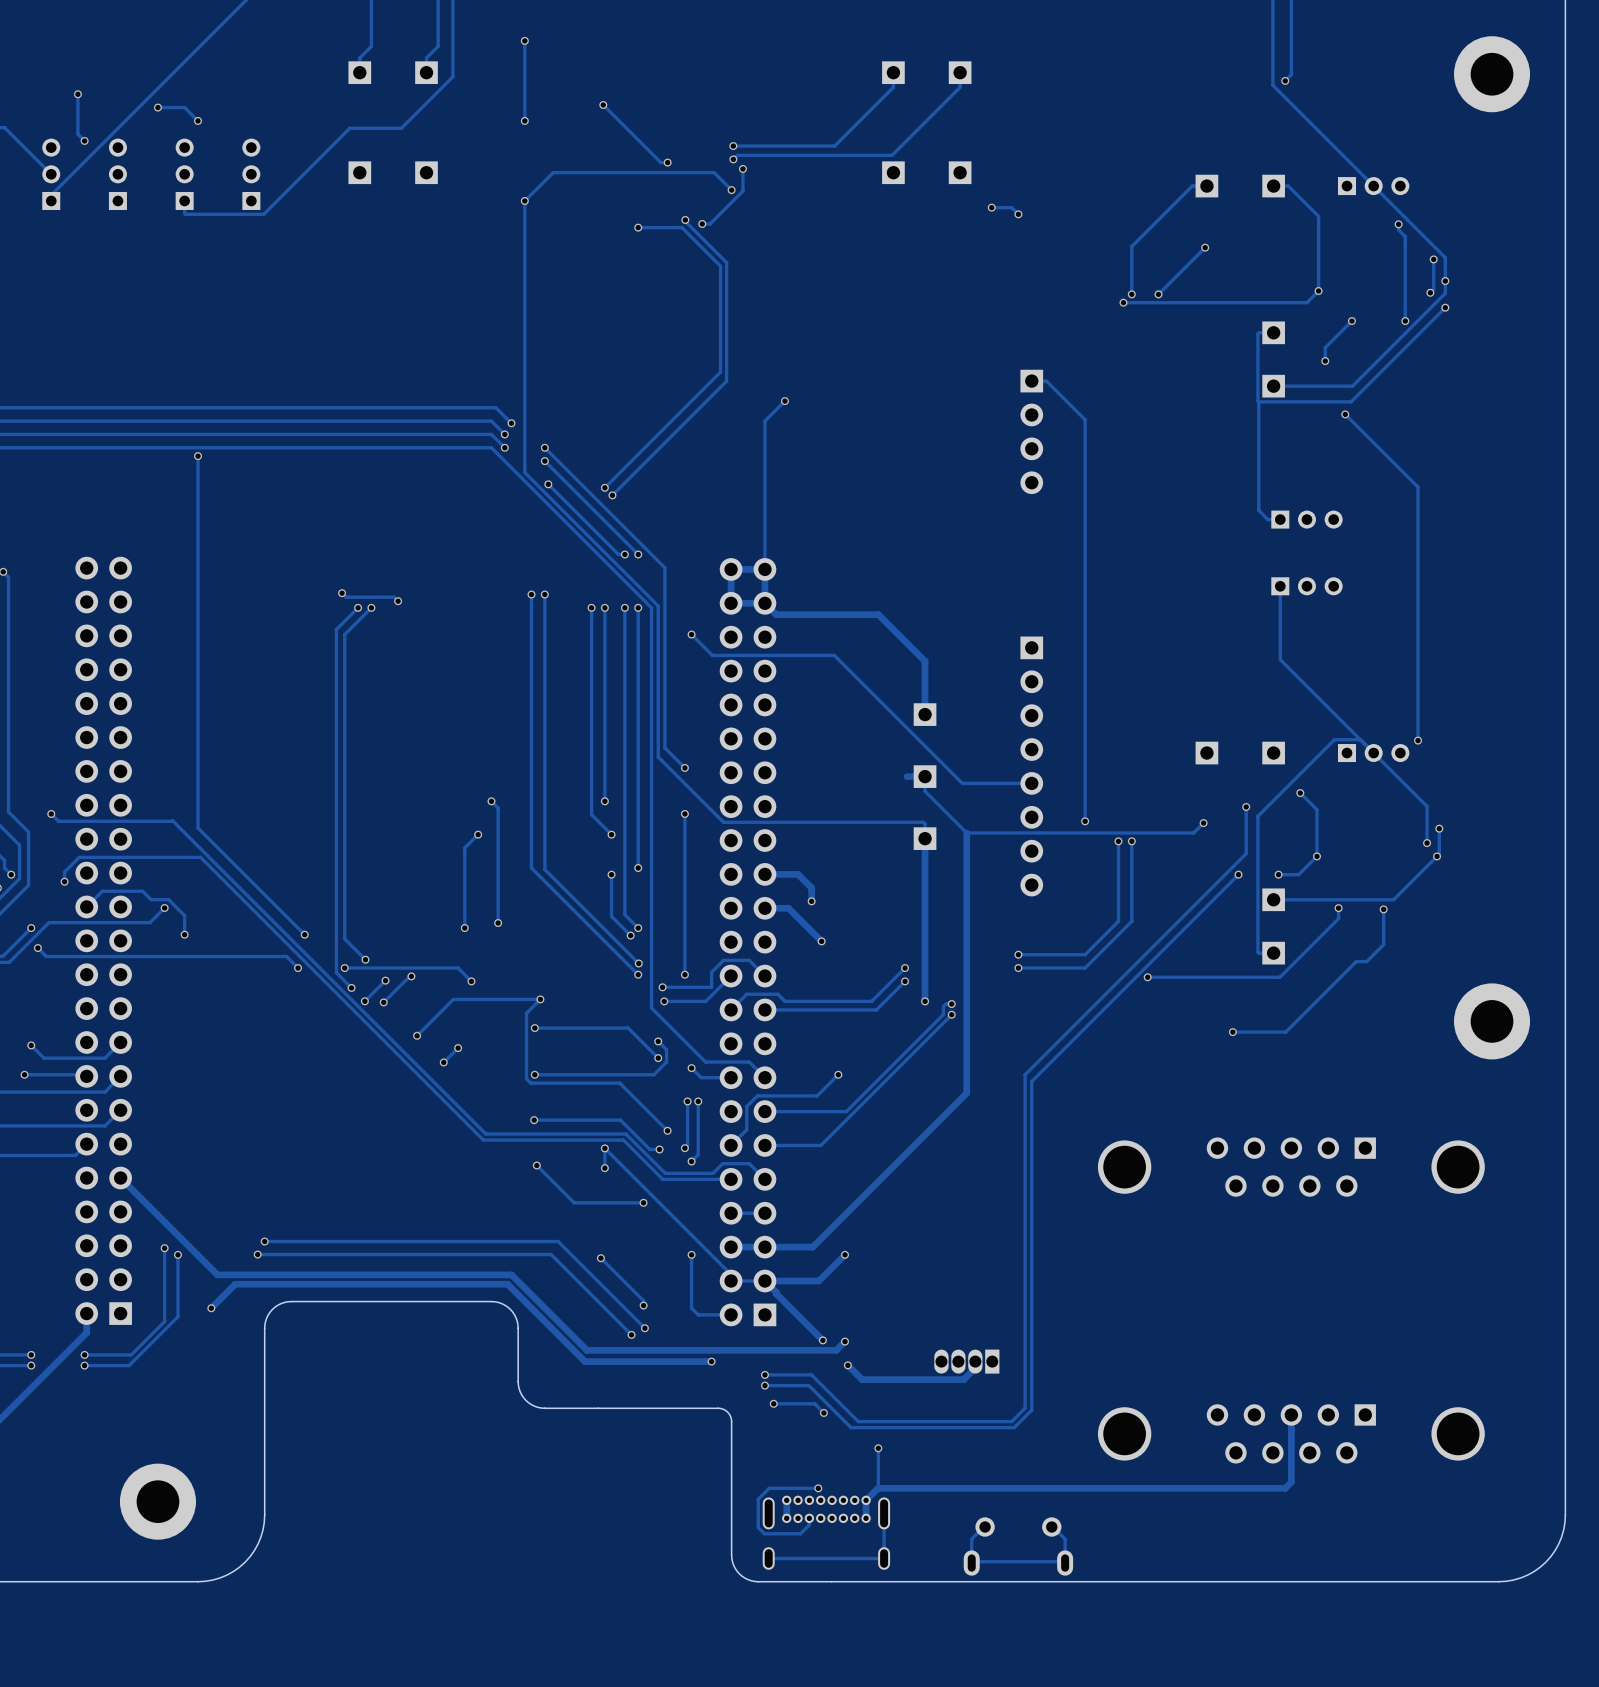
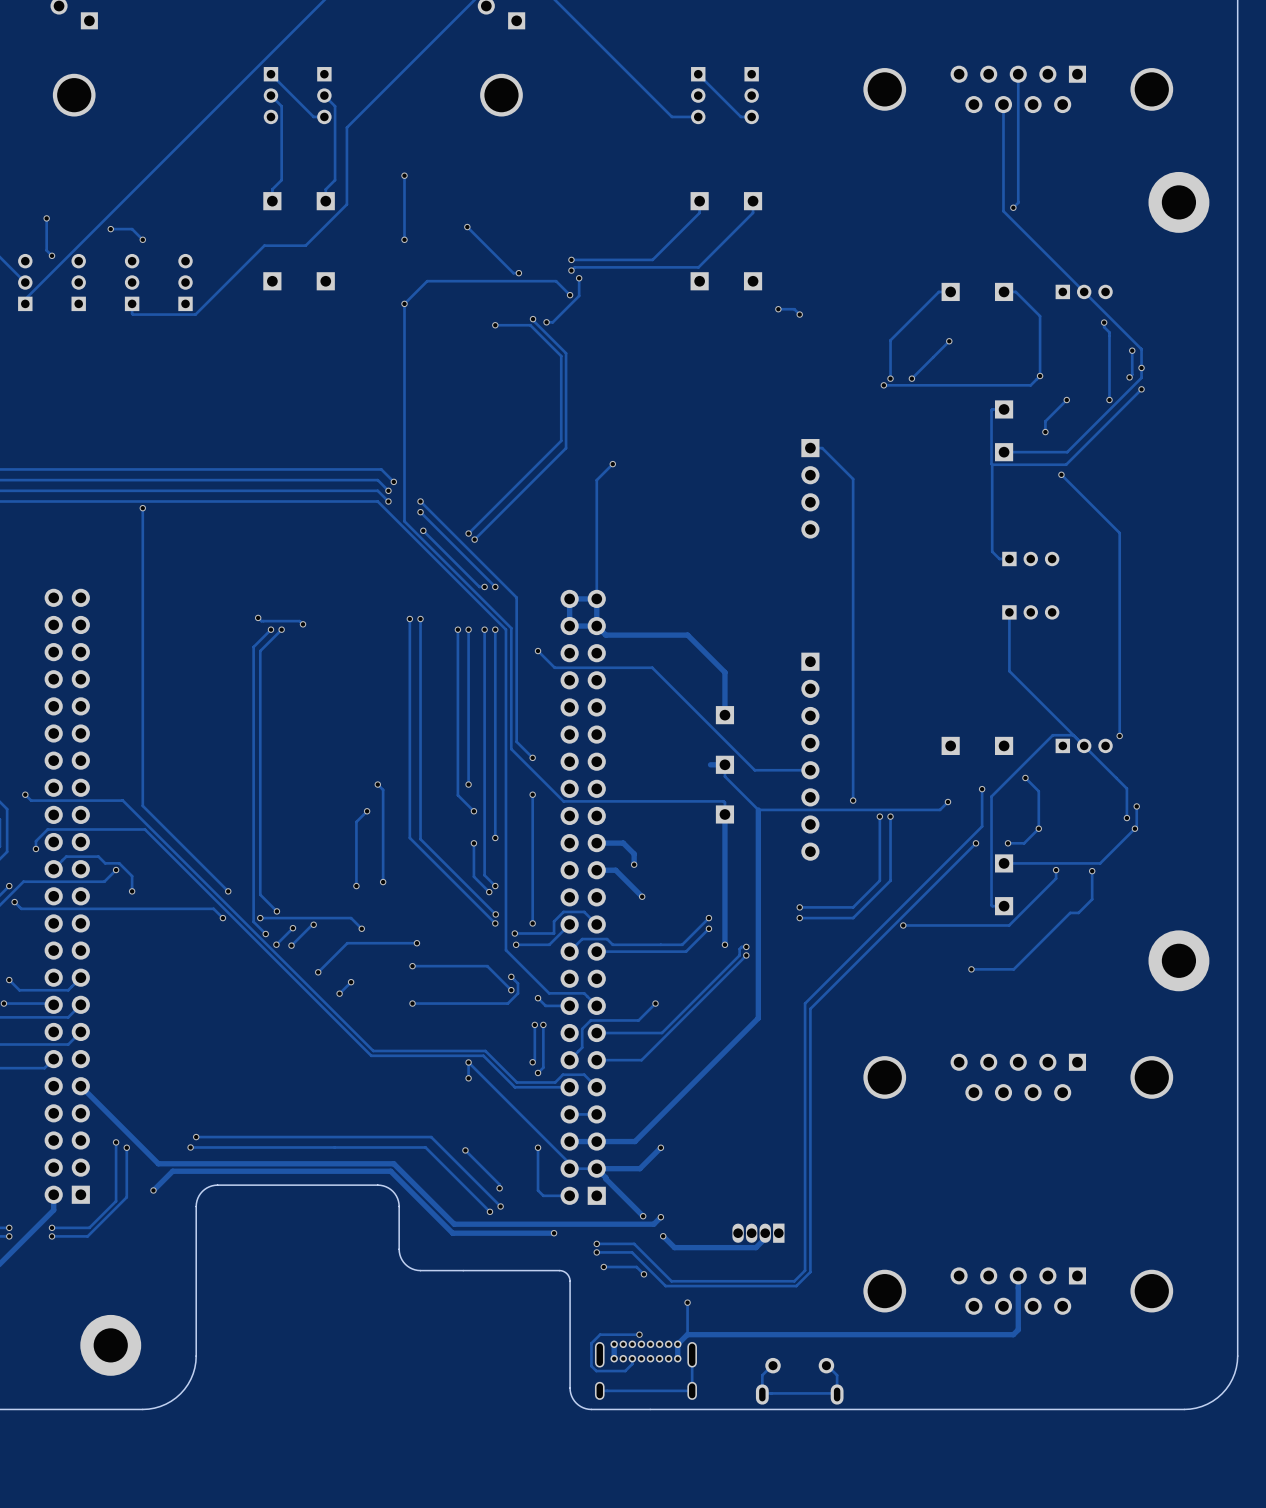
track: (540, 999) (526, 1013) (526, 1078) (530, 1083) (619, 1083) (667, 1130) -> none
track: (534, 1120) (620, 1120) (649, 1149) (659, 1149) -> none
via: (534, 1120) -> none
via: (667, 1130) -> none
via: (659, 1149) -> none
track: (536, 1165) (574, 1202) (643, 1202) -> none
via: (536, 1165) -> none
via: (643, 1202) -> none

